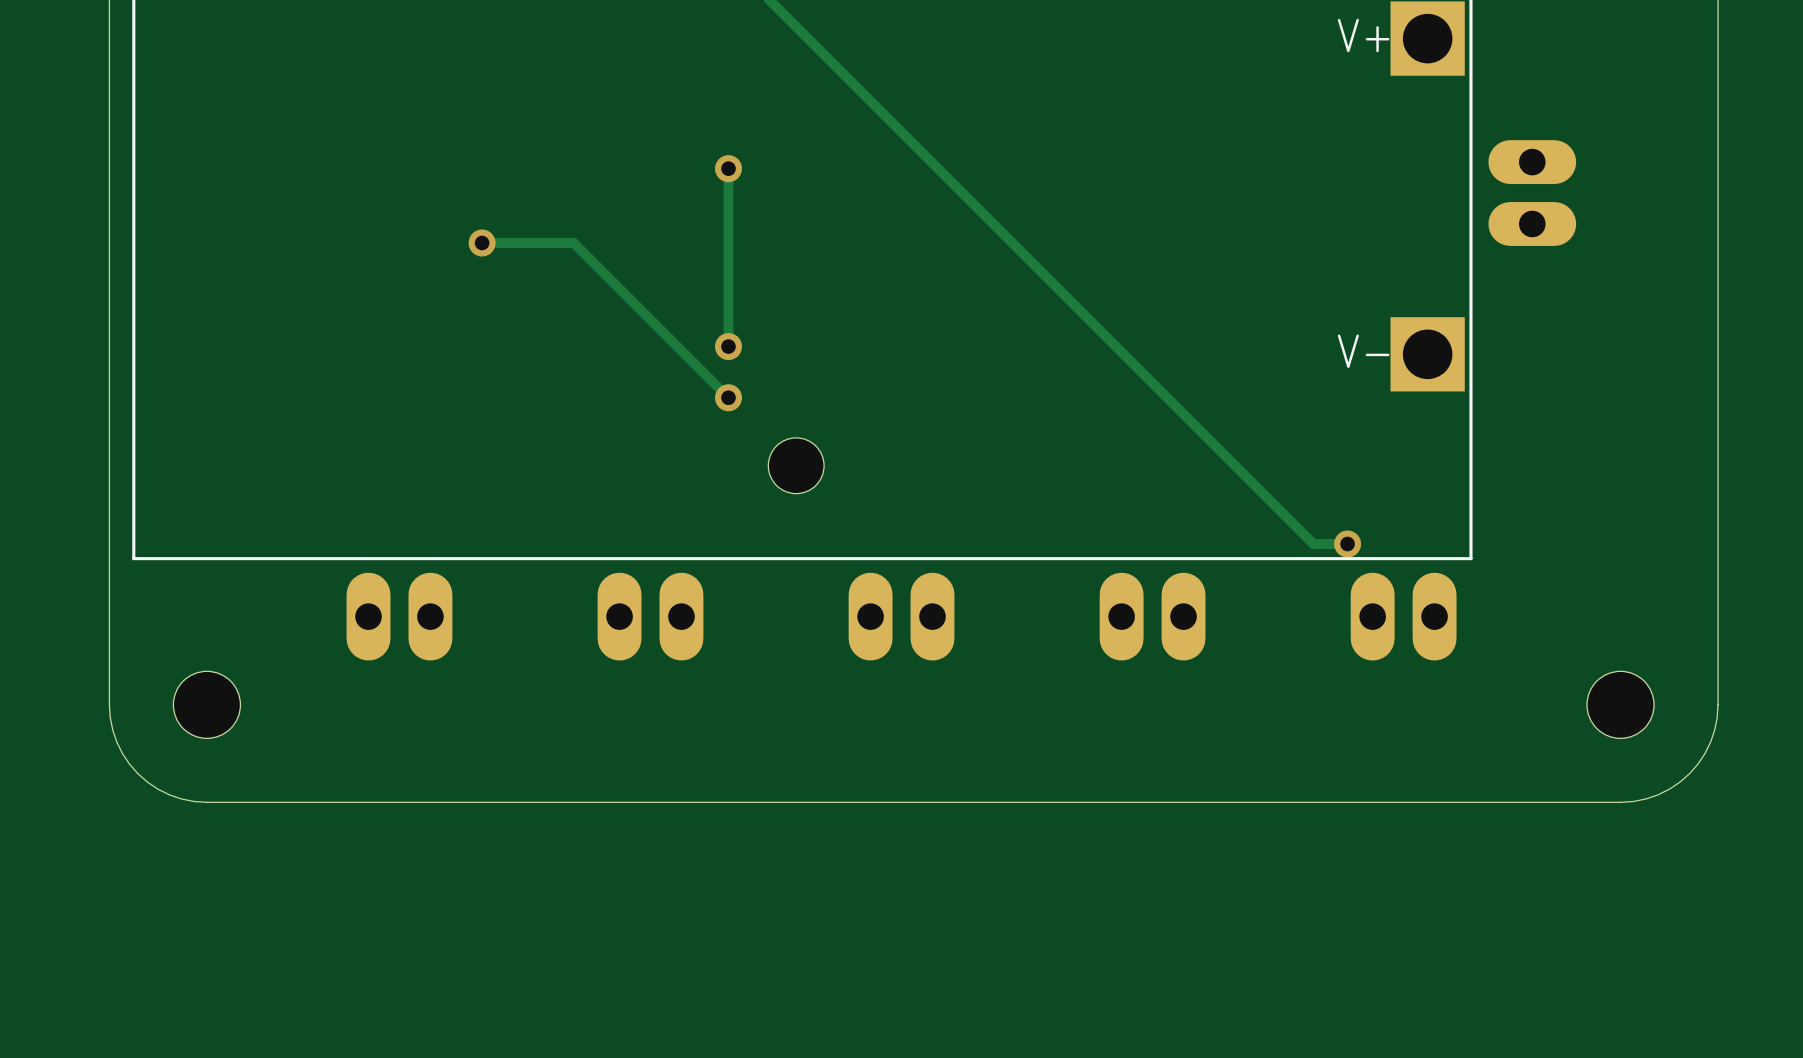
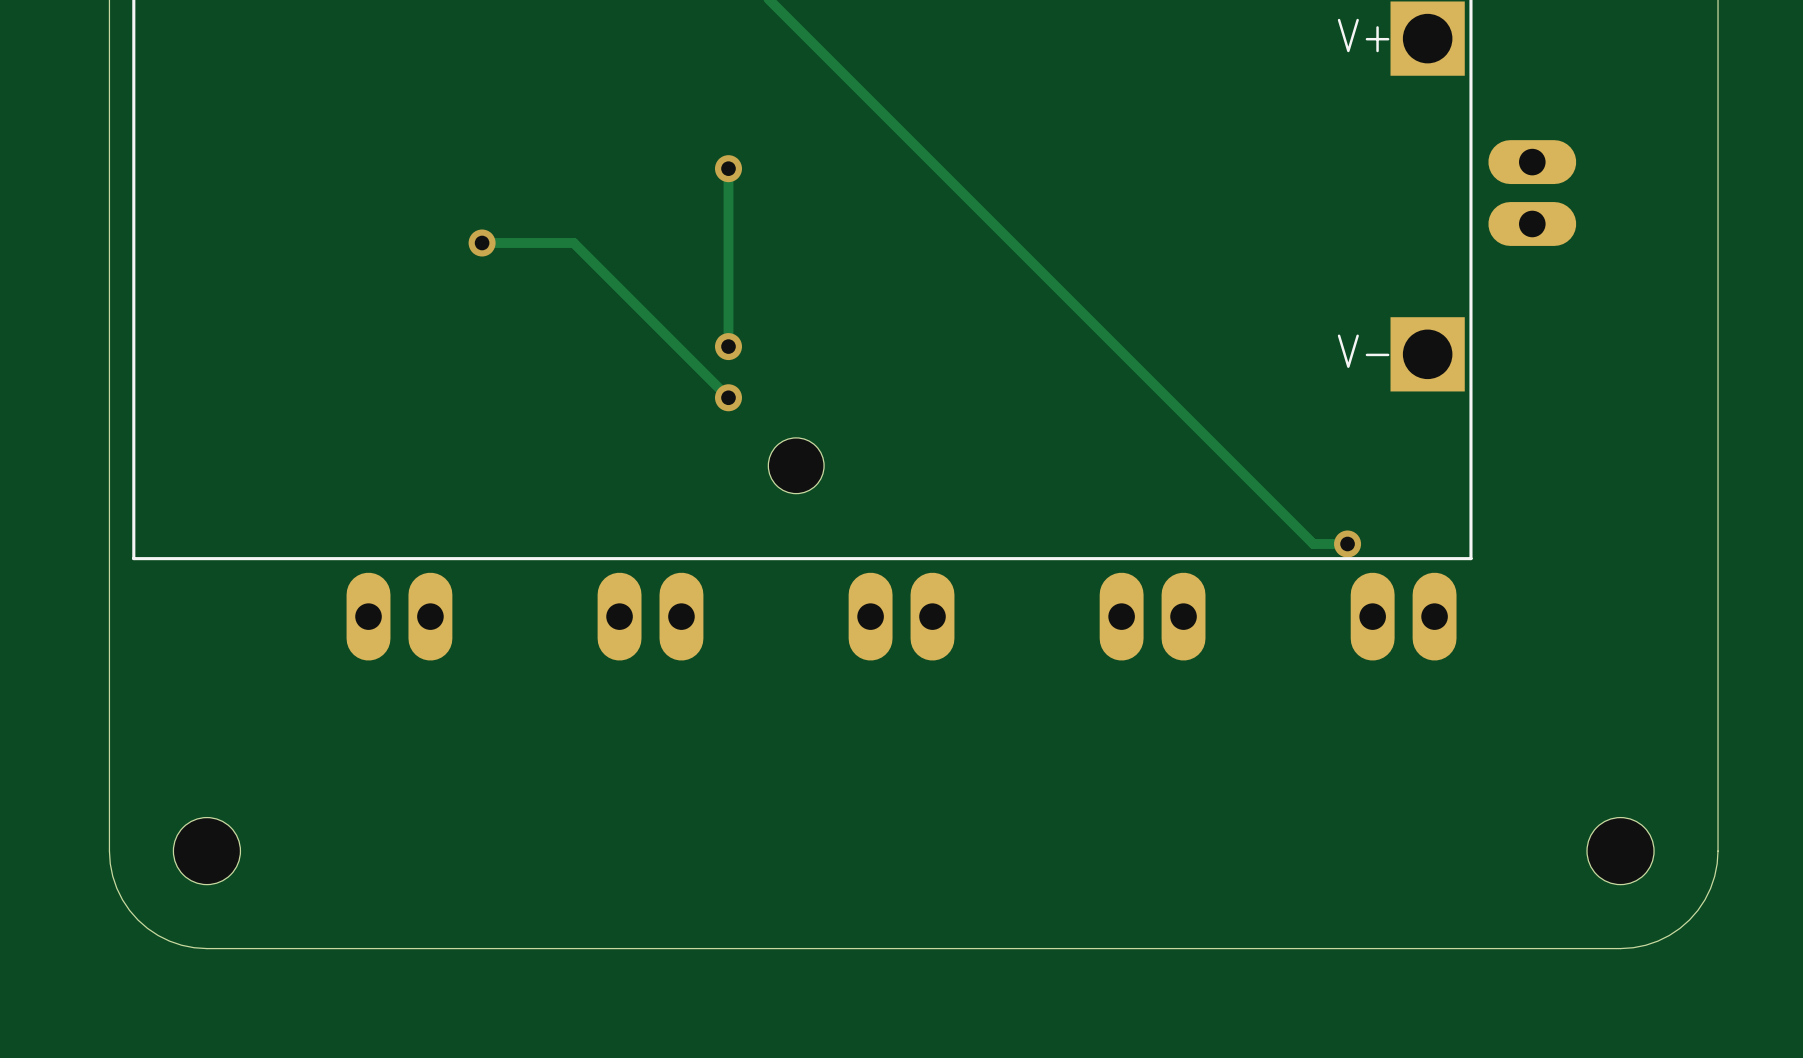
part position: (206, 704) -> (206, 851)
part position: (1620, 704) -> (1620, 851)
board edge: (1718, 704) (1717, 717) (1710, 742) (1704, 753) (1689, 773) (1669, 789) (1657, 794) (1633, 801) (1620, 802) (206, 802) (194, 801) (169, 794) (158, 789) (137, 773) (122, 753) (116, 742) (110, 717) (109, 704) -> (1718, 704) (1718, 851) (1717, 863) (1710, 888) (1697, 910) (1689, 920) (1669, 935) (1645, 945) (1620, 948) (194, 947) (169, 941) (147, 928) (129, 910) (116, 888) (110, 863) (109, 851) (109, 704)

